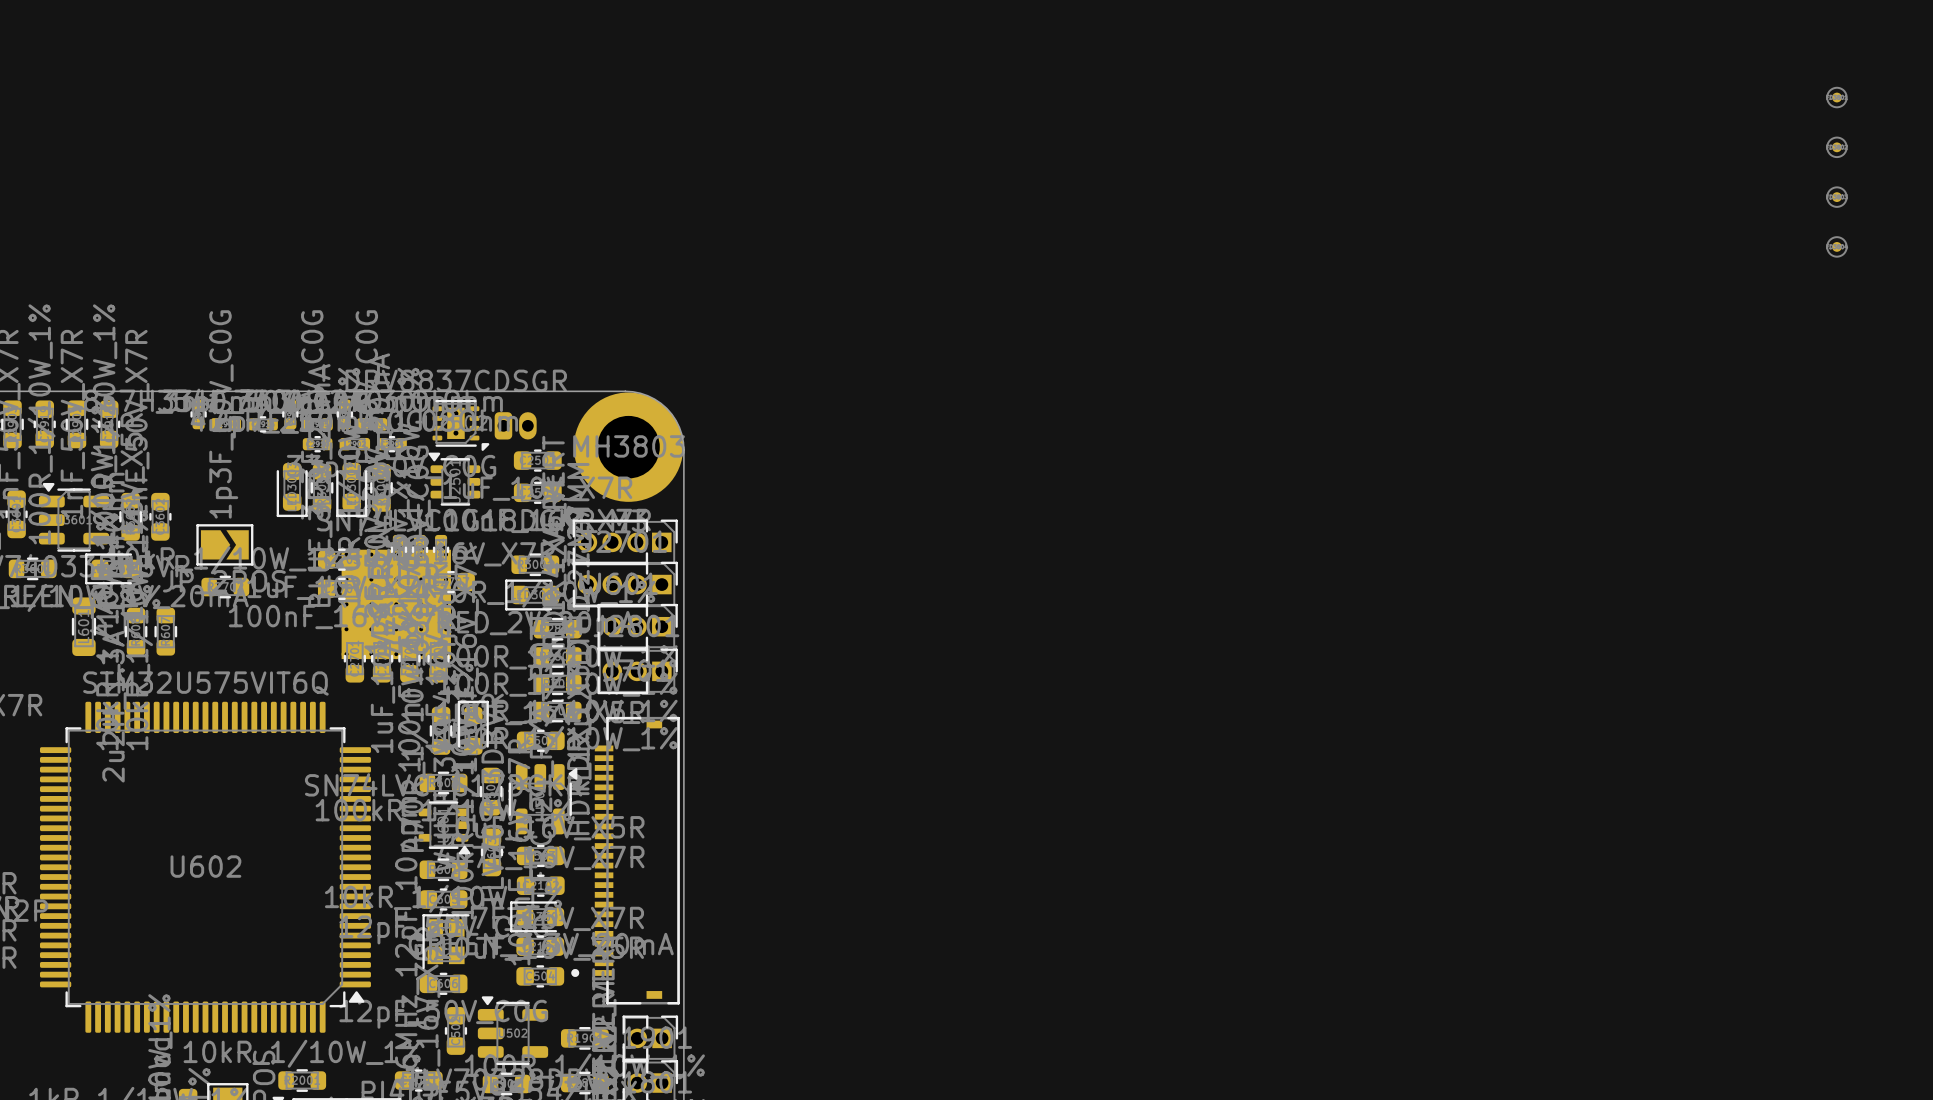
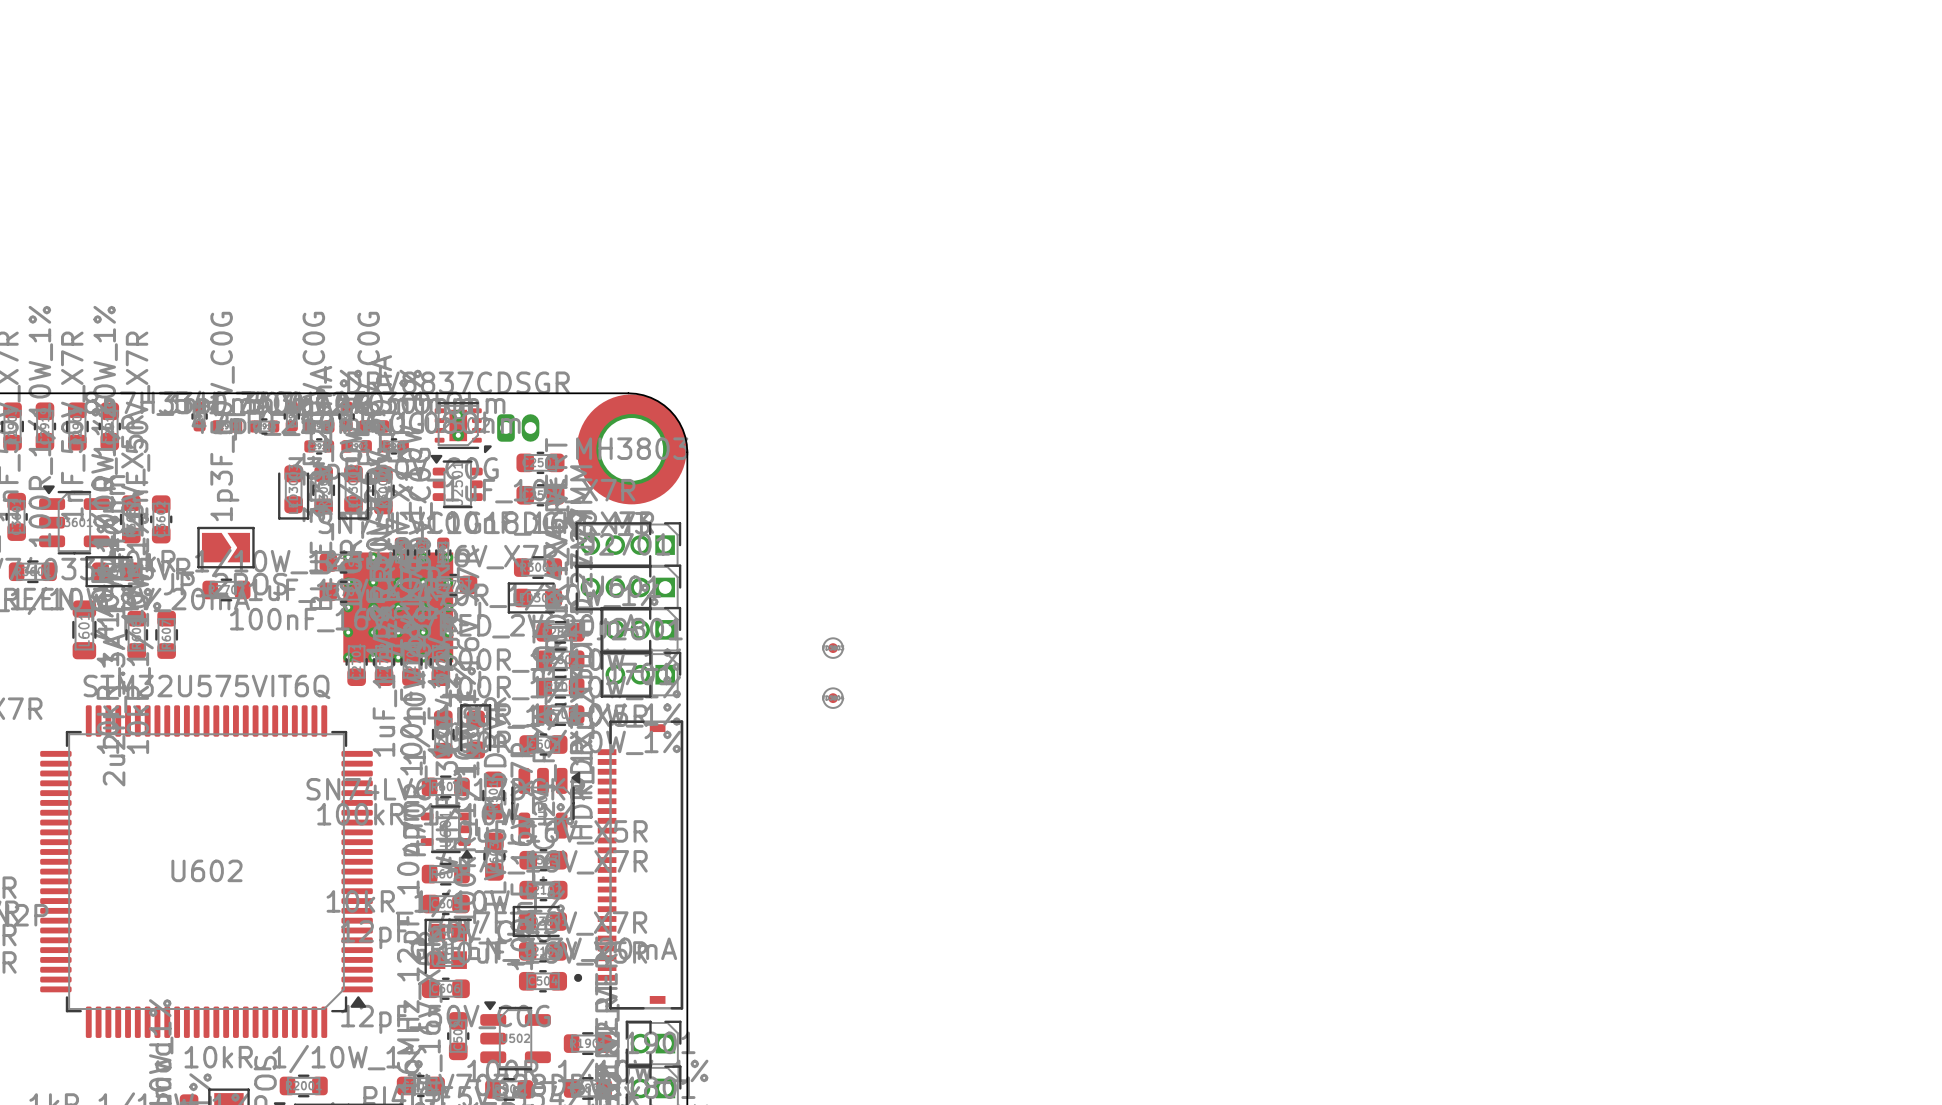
part: (1836, 97) -> none
part: (1836, 147) -> none
part position: (1836, 197) -> (833, 648)
part position: (1836, 246) -> (833, 698)

